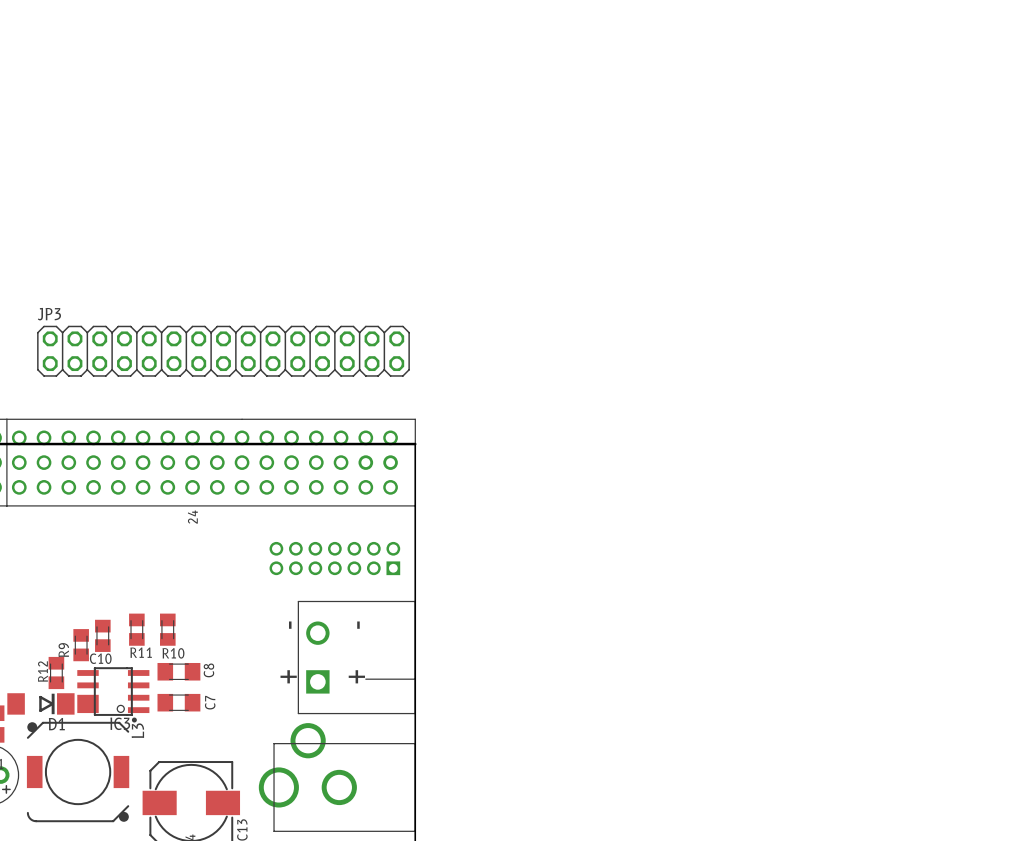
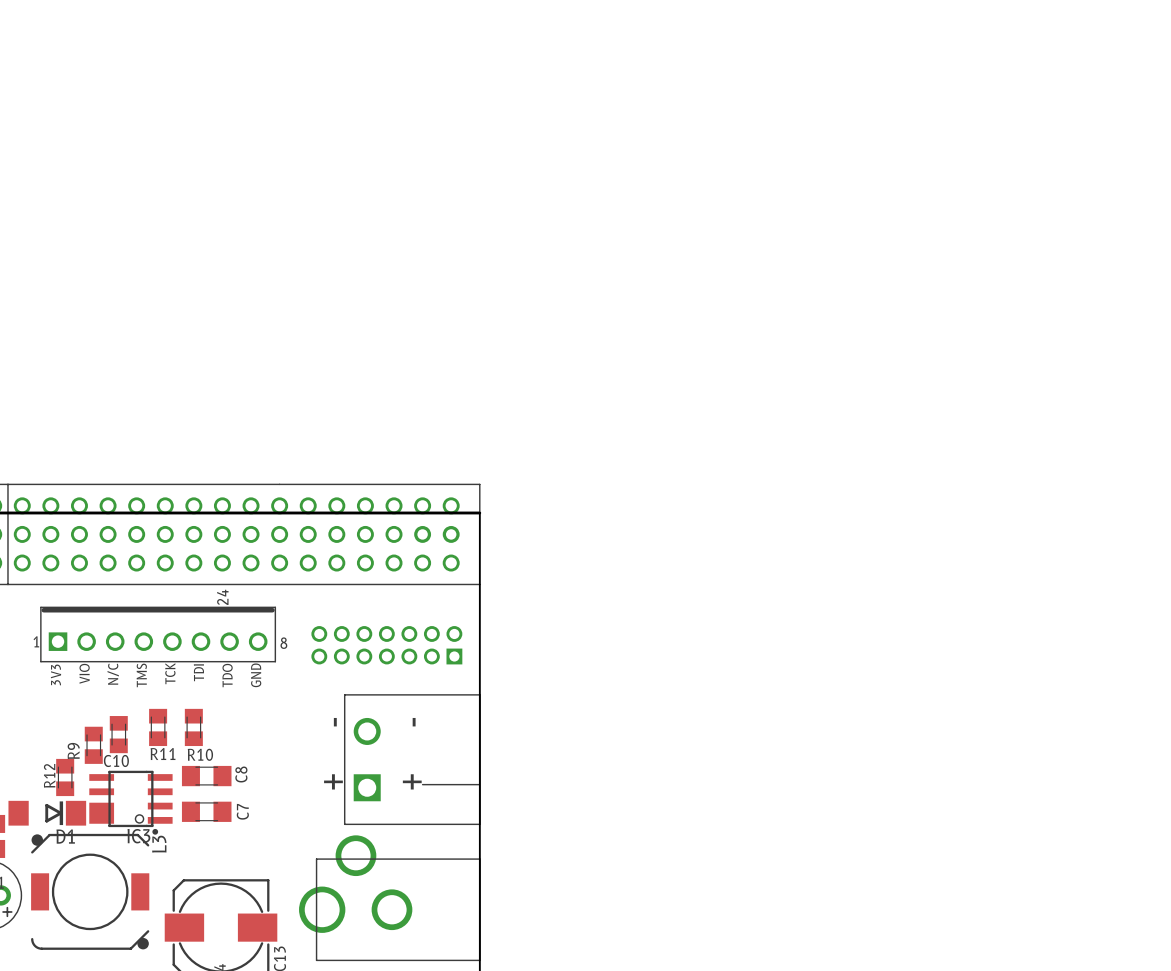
JP3: (223, 351) -> none
part: none -> (158, 634)

